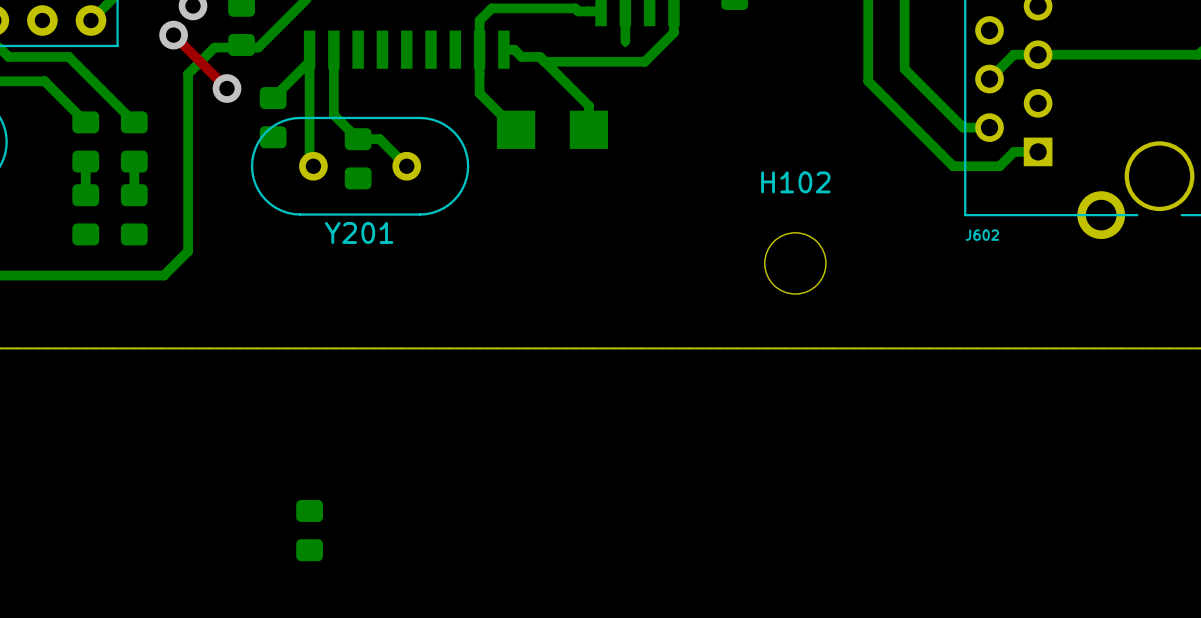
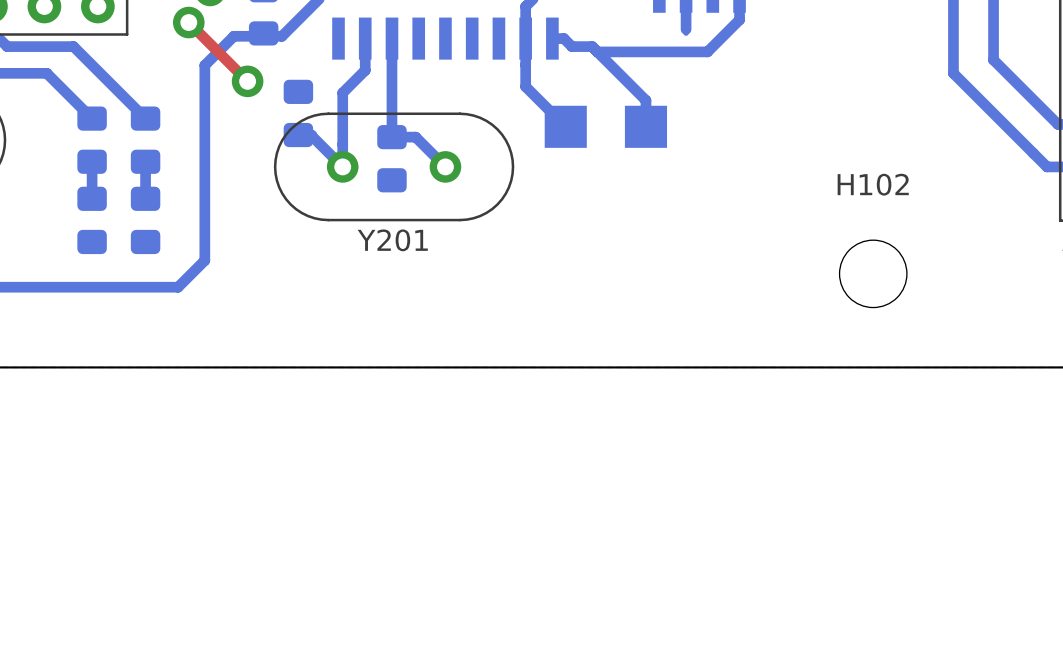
bottom track: (309, 49) (309, 162) -> (311, 135) (338, 162)
bottom track: (309, 61) (273, 98) -> none
bottom track: (333, 78) (333, 114) (358, 139) -> (391, 38) (391, 137)
bottom track: none -> (365, 70) (342, 92) (342, 166)
part: (309, 530) -> none

